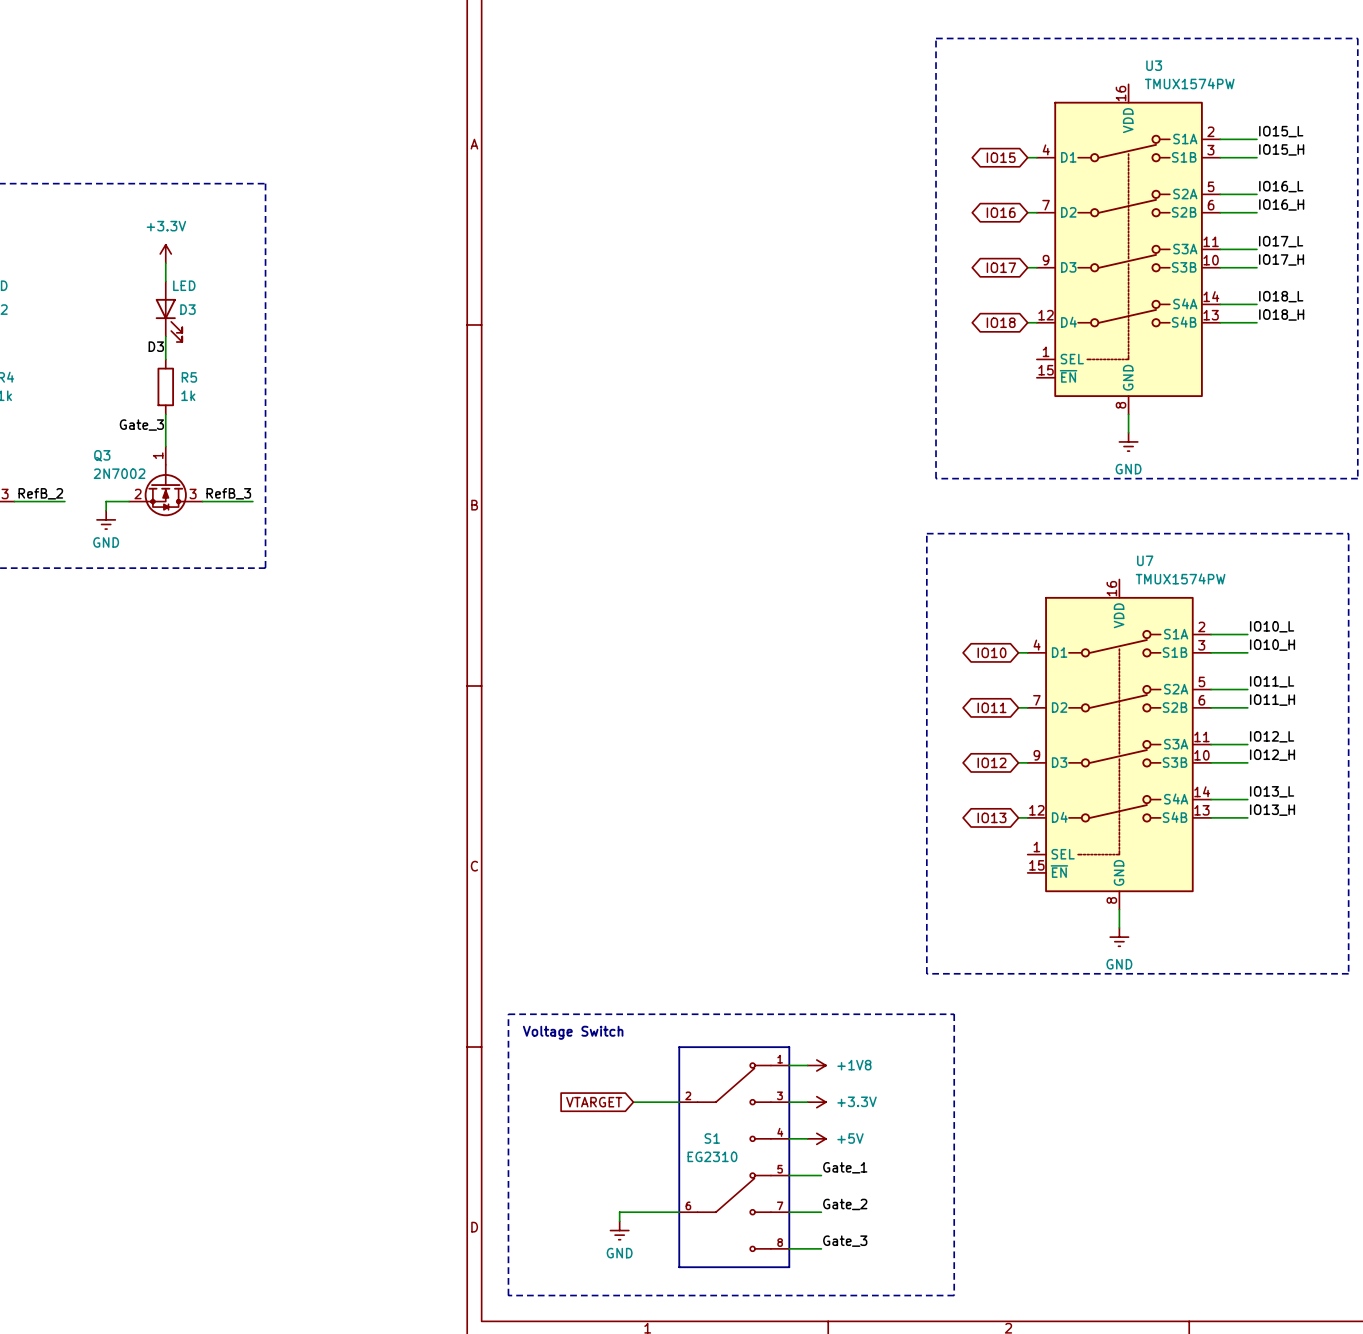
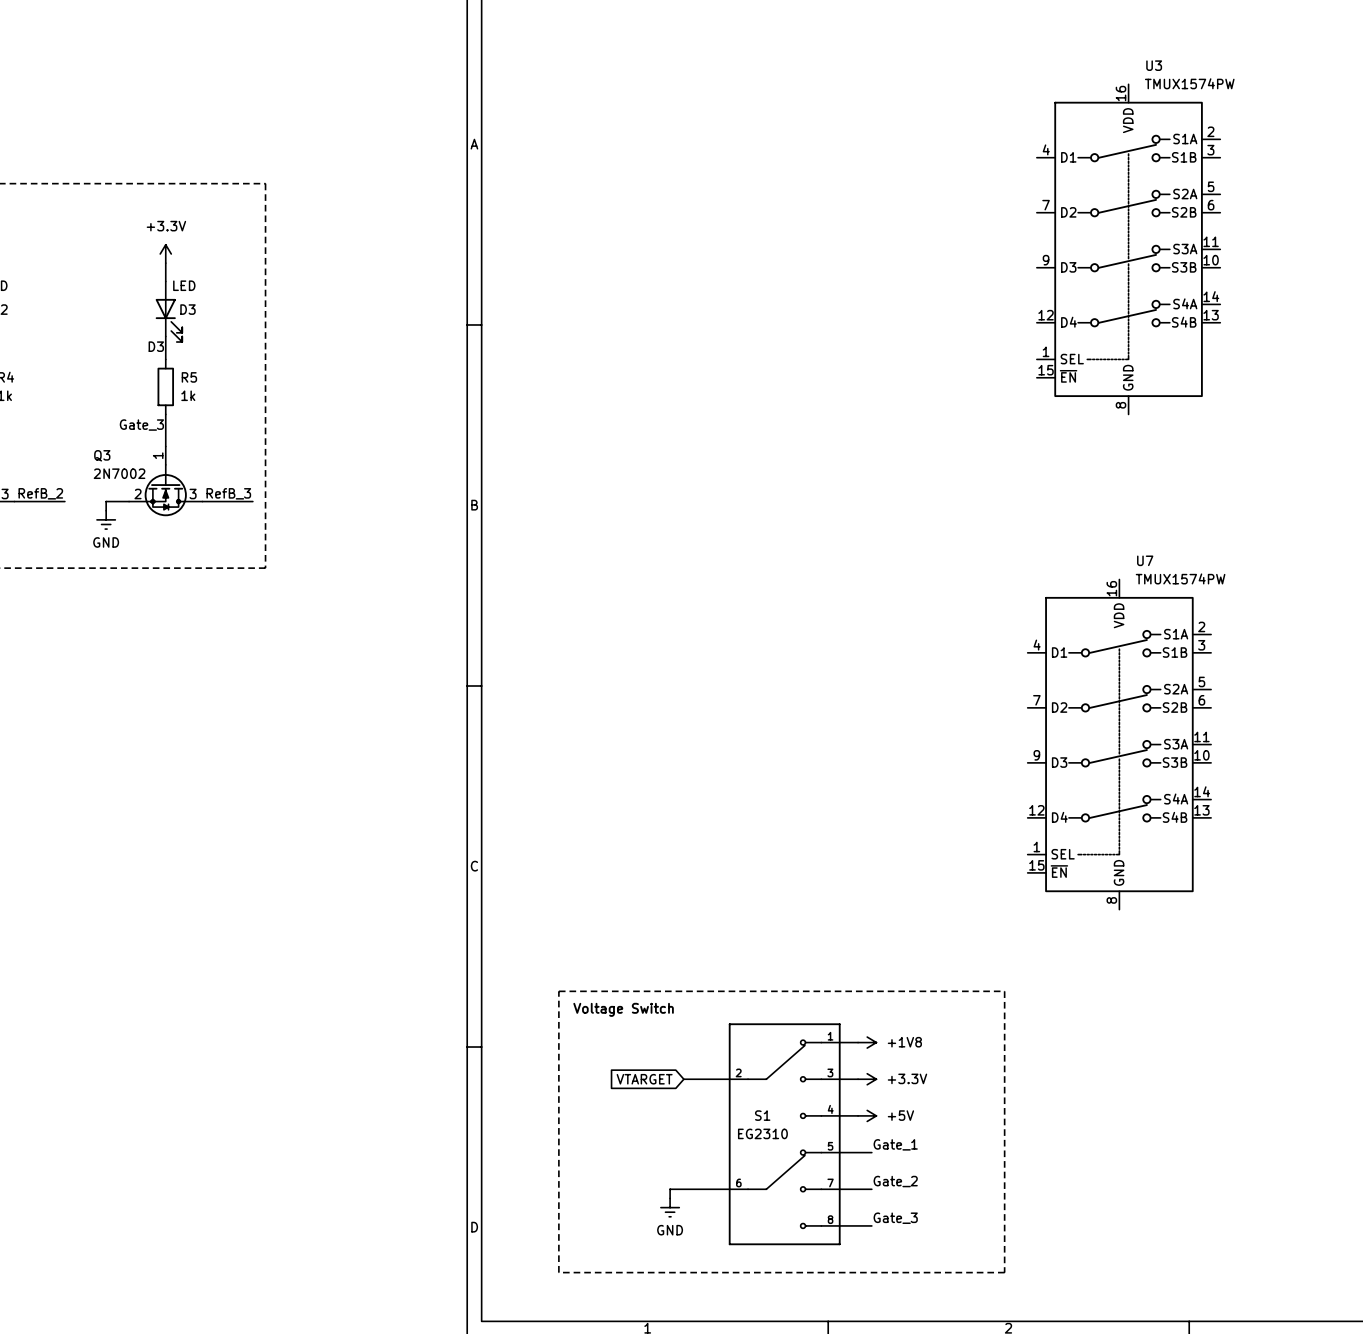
line: (936, 38) (1357, 38) (1357, 478) (936, 478) (936, 38) -> none
label: IO15_L (1281, 131) -> none
wire: (1220, 139) (1256, 139) -> none
label: IO15_H (1281, 149) -> none
global label: IO15 (1001, 157) -> none
wire: (1027, 157) (1036, 157) -> none
wire: (1220, 157) (1256, 157) -> none
label: IO16_L (1281, 186) -> none
wire: (1220, 194) (1256, 194) -> none
label: IO16_H (1281, 204) -> none
global label: IO16 (1001, 212) -> none
wire: (1027, 212) (1036, 212) -> none
wire: (1220, 212) (1256, 212) -> none
label: IO17_L (1281, 241) -> none
wire: (1220, 249) (1256, 249) -> none
label: IO17_H (1281, 259) -> none
global label: IO17 (1001, 267) -> none
wire: (1027, 267) (1036, 267) -> none
wire: (1220, 267) (1256, 267) -> none
label: IO18_L (1281, 296) -> none
wire: (1220, 304) (1256, 304) -> none
label: IO18_H (1281, 315) -> none
global label: IO18 (1001, 322) -> none
wire: (1027, 322) (1036, 322) -> none
wire: (1220, 322) (1256, 322) -> none
wire: (1128, 414) (1128, 432) -> none
power symbol: GND (1128, 441) -> none
line: (926, 533) (1348, 533) (1348, 973) (926, 973) (926, 533) -> none
label: IO10_L (1272, 626) -> none
wire: (1211, 634) (1247, 634) -> none
label: IO10_H (1272, 645) -> none
global label: IO10 (991, 652) -> none
wire: (1018, 652) (1027, 652) -> none
wire: (1211, 652) (1247, 652) -> none
label: IO11_L (1272, 681) -> none
wire: (1211, 689) (1247, 689) -> none
label: IO11_H (1272, 700) -> none
global label: IO11 (991, 707) -> none
wire: (1018, 707) (1027, 707) -> none
wire: (1211, 707) (1247, 707) -> none
label: IO12_L (1272, 736) -> none
wire: (1211, 744) (1247, 744) -> none
label: IO12_H (1272, 755) -> none
global label: IO12 (991, 762) -> none
wire: (1018, 762) (1027, 762) -> none
wire: (1211, 762) (1247, 762) -> none
label: IO13_L (1272, 791) -> none
wire: (1211, 799) (1247, 799) -> none
label: IO13_H (1272, 810) -> none
global label: IO13 (991, 817) -> none
wire: (1018, 817) (1027, 817) -> none
wire: (1211, 817) (1247, 817) -> none
wire: (1119, 909) (1119, 927) -> none
power symbol: GND (1119, 937) -> none
line: (508, 1014) (954, 1014) (954, 1295) (508, 1295) (508, 1014) -> (558, 991) (1004, 991) (1004, 1272) (558, 1272) (558, 991)
text position: Voltage Switch (573, 1032) -> Voltage Switch (623, 1009)
line: (679, 1047) (789, 1047) (789, 1267) (679, 1267) (679, 1047) -> (729, 1024) (839, 1024) (839, 1244) (729, 1244) (729, 1024)
wire: (789, 1065) (807, 1065) -> (839, 1042) (858, 1042)
power symbol position: +1V8 (816, 1065) -> +1V8 (867, 1042)
global label position: VTARGET (594, 1102) -> VTARGET (644, 1079)
wire: (633, 1102) (679, 1102) -> (683, 1079) (729, 1079)
wire: (789, 1102) (807, 1102) -> (839, 1079) (858, 1079)
power symbol position: +3.3V (816, 1102) -> +3.3V (867, 1079)
wire: (789, 1138) (807, 1138) -> (839, 1115) (858, 1115)
power symbol position: +5V (816, 1138) -> +5V (867, 1115)
S1 position: (734, 1157) -> (784, 1134)
label position: Gate_1 (845, 1167) -> Gate_1 (895, 1144)
wire: (789, 1175) (821, 1175) -> (839, 1152) (871, 1152)
label position: Gate_2 (845, 1204) -> Gate_2 (895, 1181)
wire: (679, 1212) (619, 1212) (619, 1221) -> (729, 1189) (670, 1189) (670, 1198)
wire: (789, 1212) (821, 1212) -> (839, 1189) (871, 1189)
power symbol position: GND (619, 1230) -> GND (670, 1207)
label position: Gate_3 (845, 1241) -> Gate_3 (895, 1218)
wire: (789, 1248) (821, 1248) -> (839, 1225) (871, 1225)

